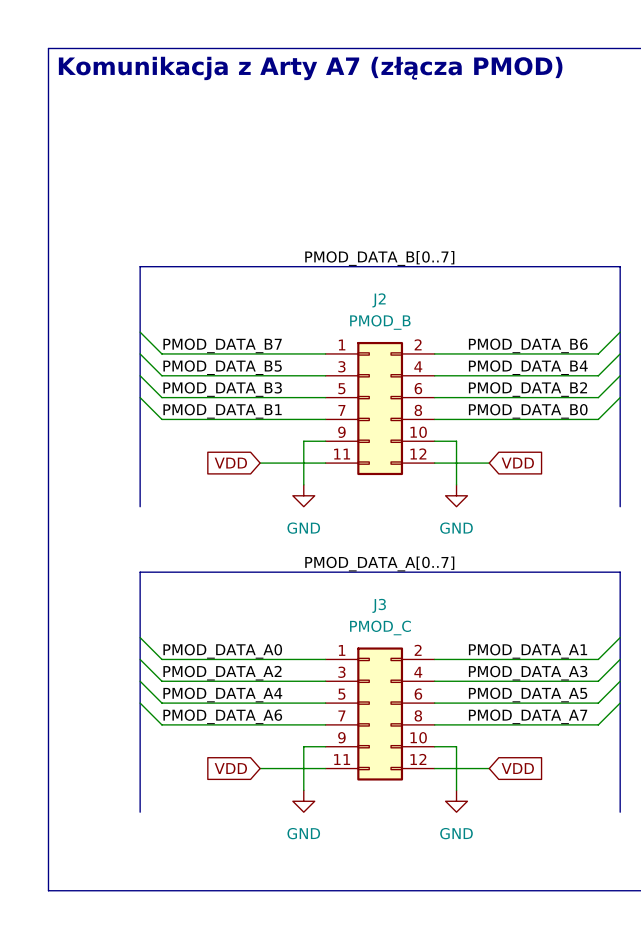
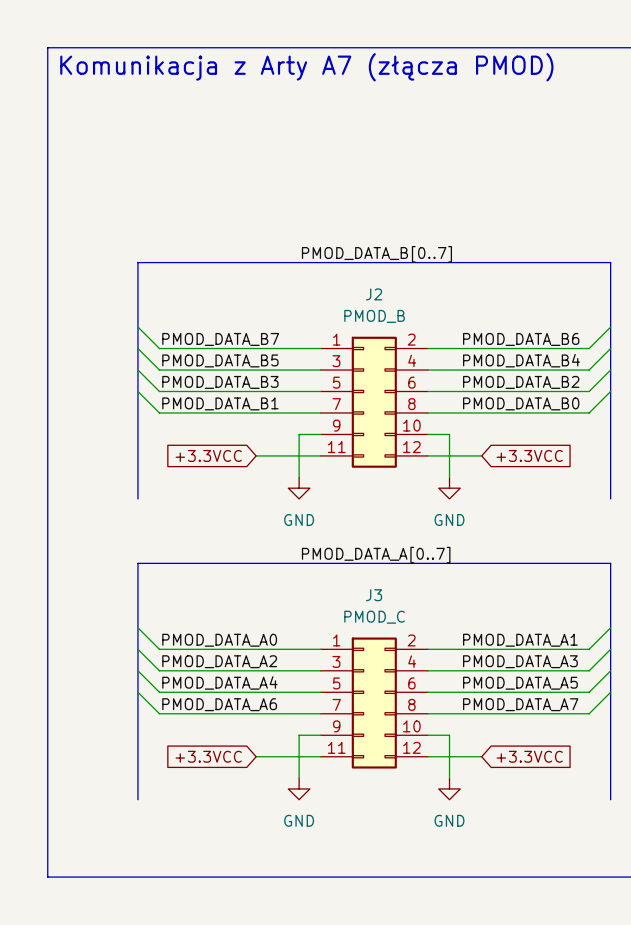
global label: VDD (230, 463) -> +3.3VCC (208, 455)
global label: VDD (517, 463) -> +3.3VCC (529, 455)
global label: VDD (230, 768) -> +3.3VCC (208, 756)
global label: VDD (517, 768) -> +3.3VCC (529, 756)

